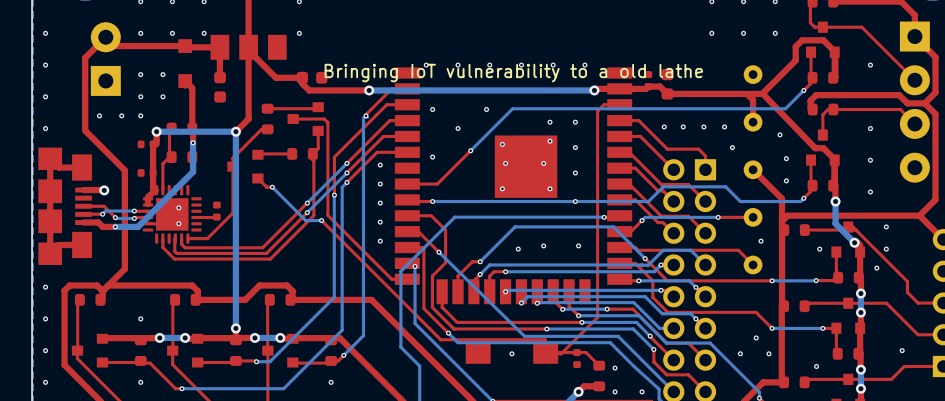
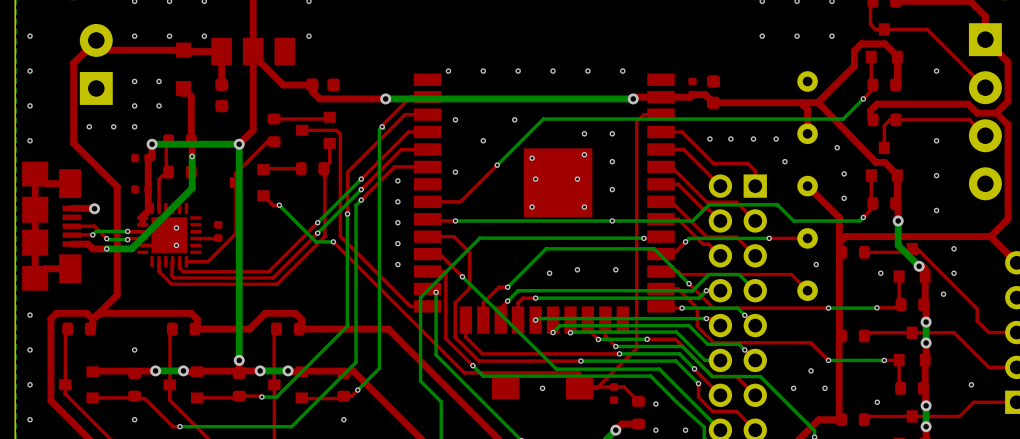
text: Bringing IoT vulnerability to a old lathe (513, 73) -> none

